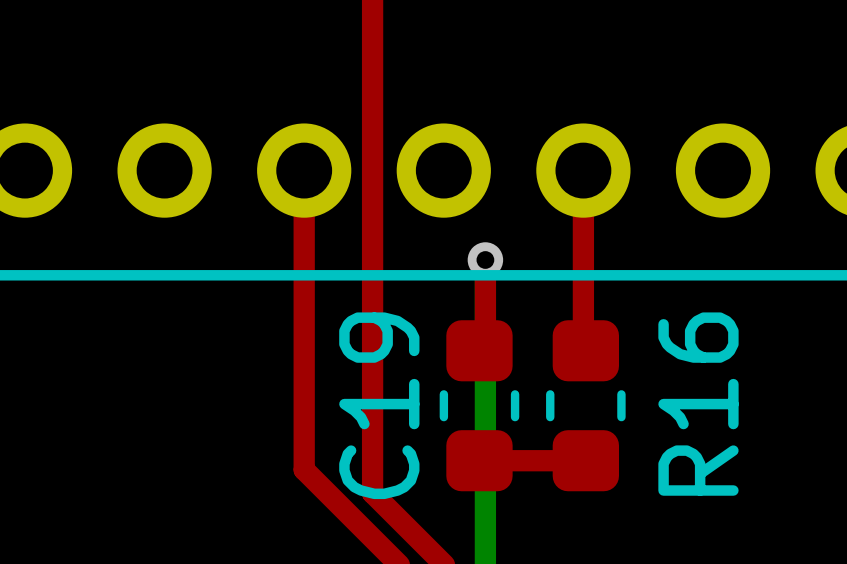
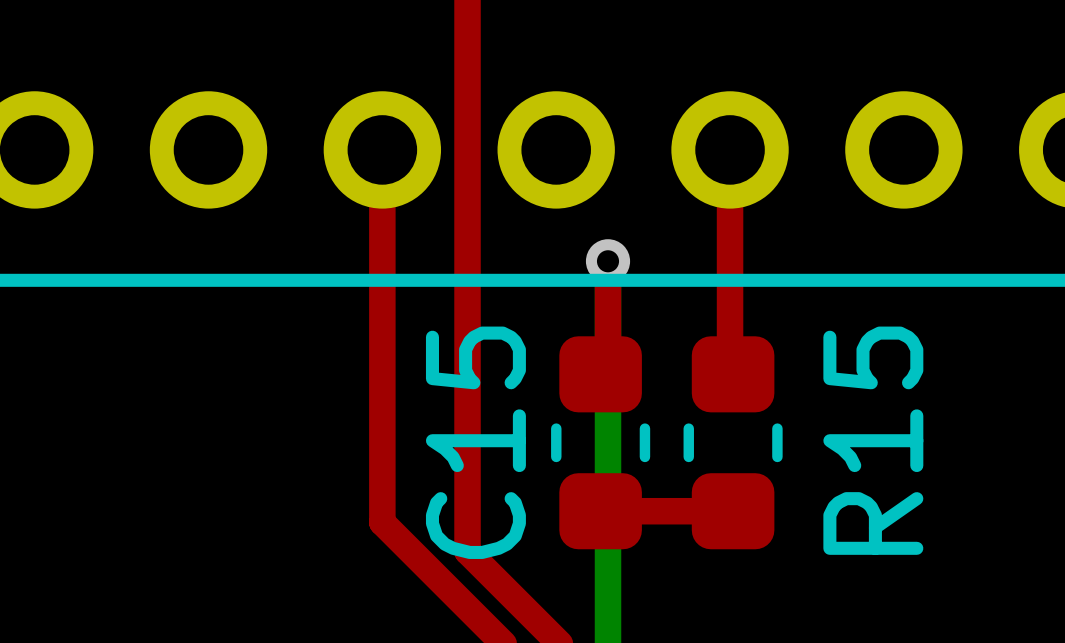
R16 name: R16 (698, 404) -> R15 (873, 440)
C19 name: C19 (379, 405) -> C15 (475, 442)

